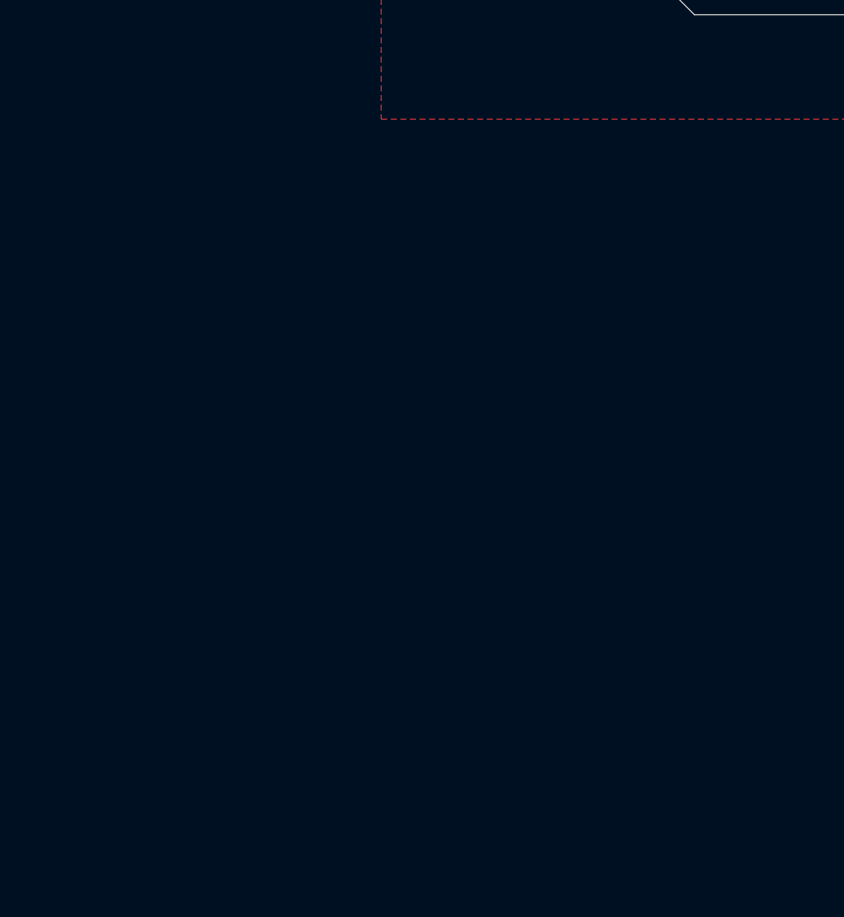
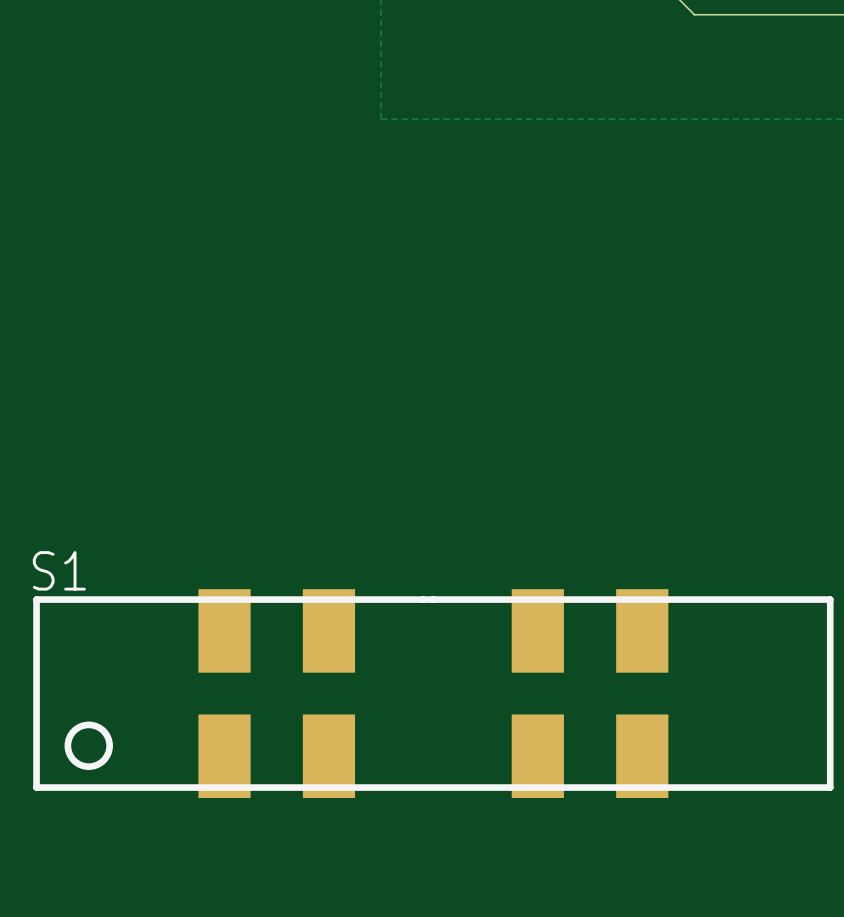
S1: none -> (433, 693)

